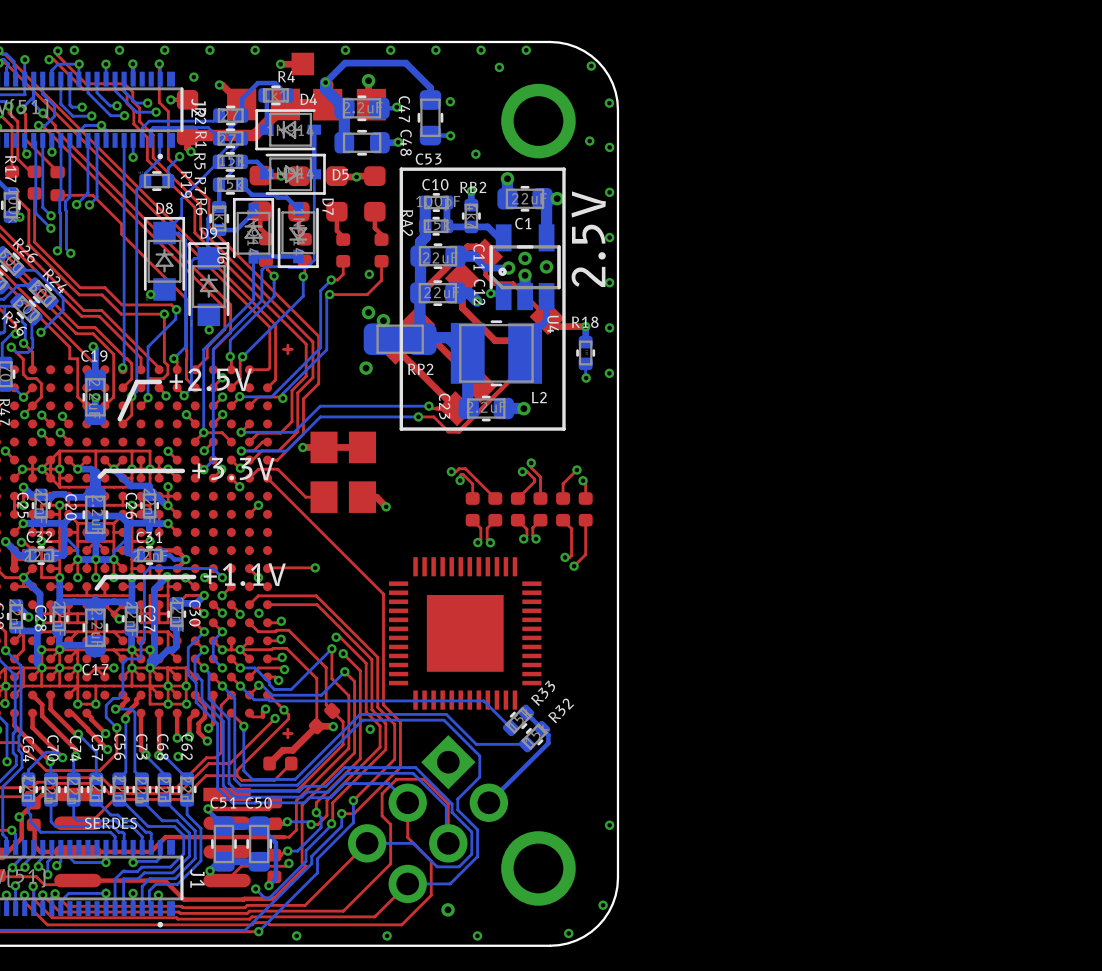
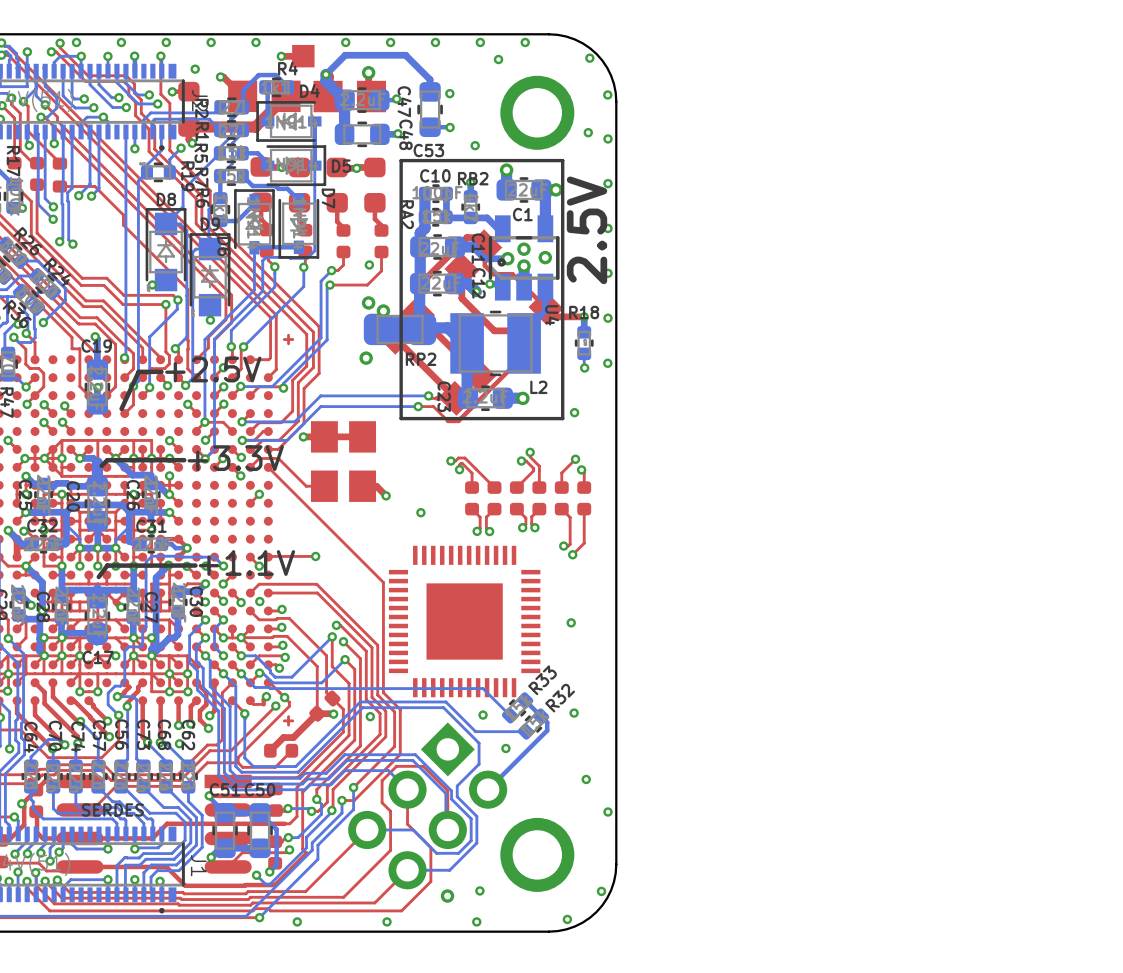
via: none -> (574, 412)
via: none -> (420, 512)
via: none -> (571, 622)
via: none -> (574, 713)
via: none -> (483, 715)
via: none -> (505, 748)
via: none -> (586, 779)
via: none -> (479, 890)

